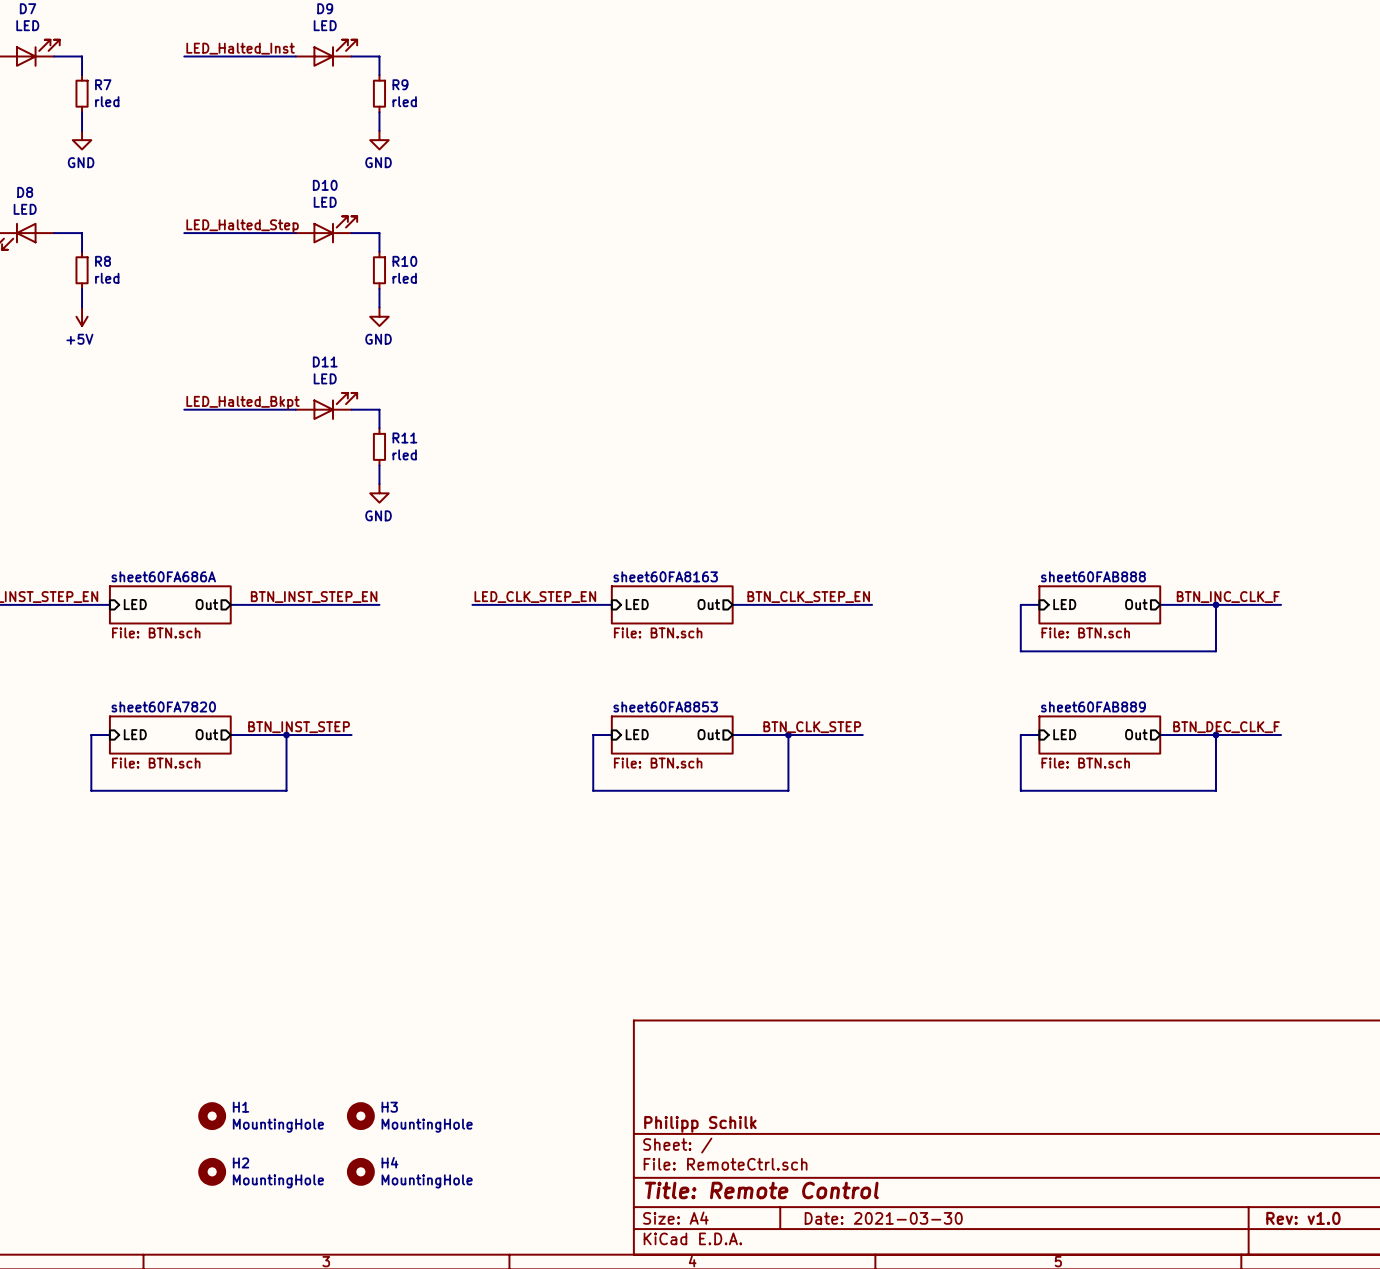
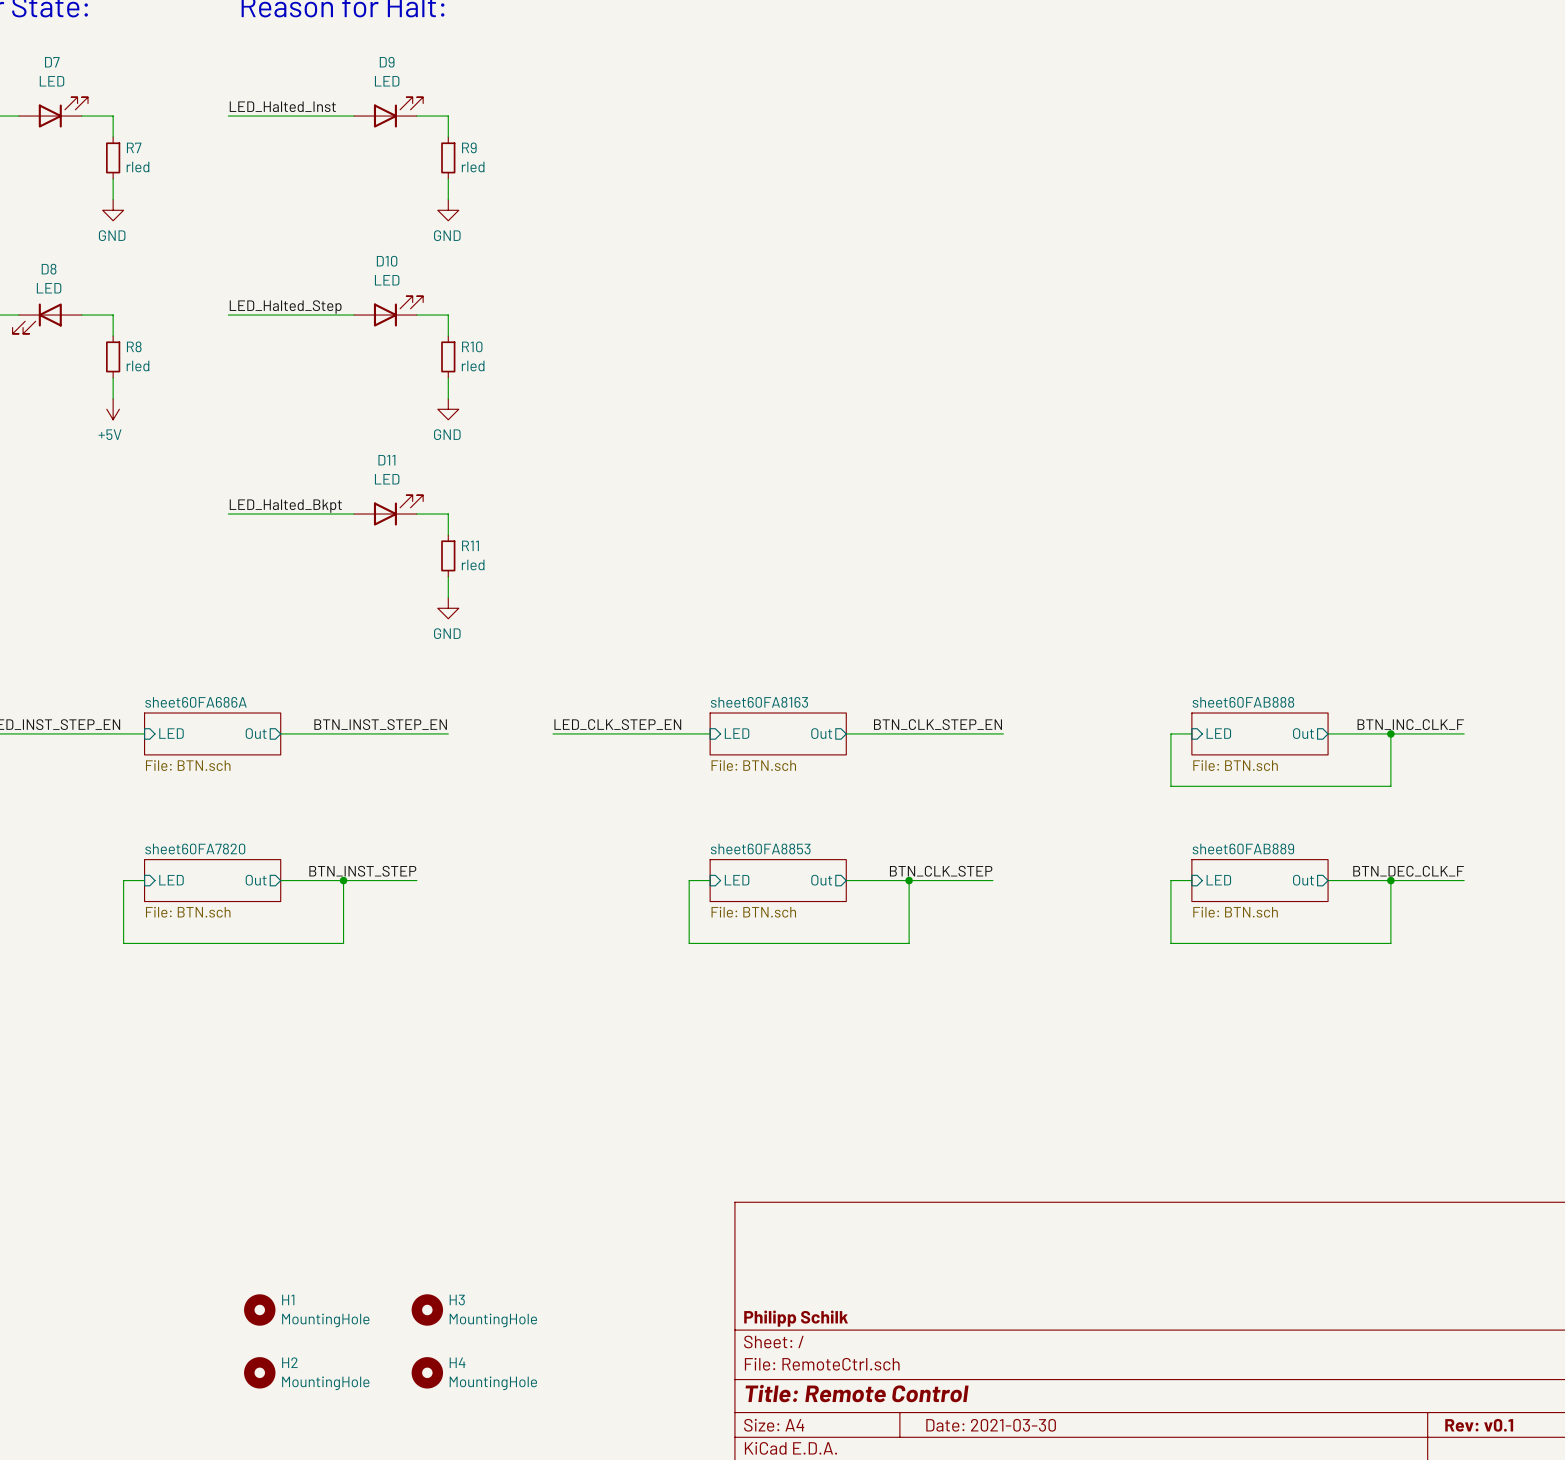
title block: Rev: v1.0 (1303, 1218) -> Rev: v0.1 (1479, 1425)

